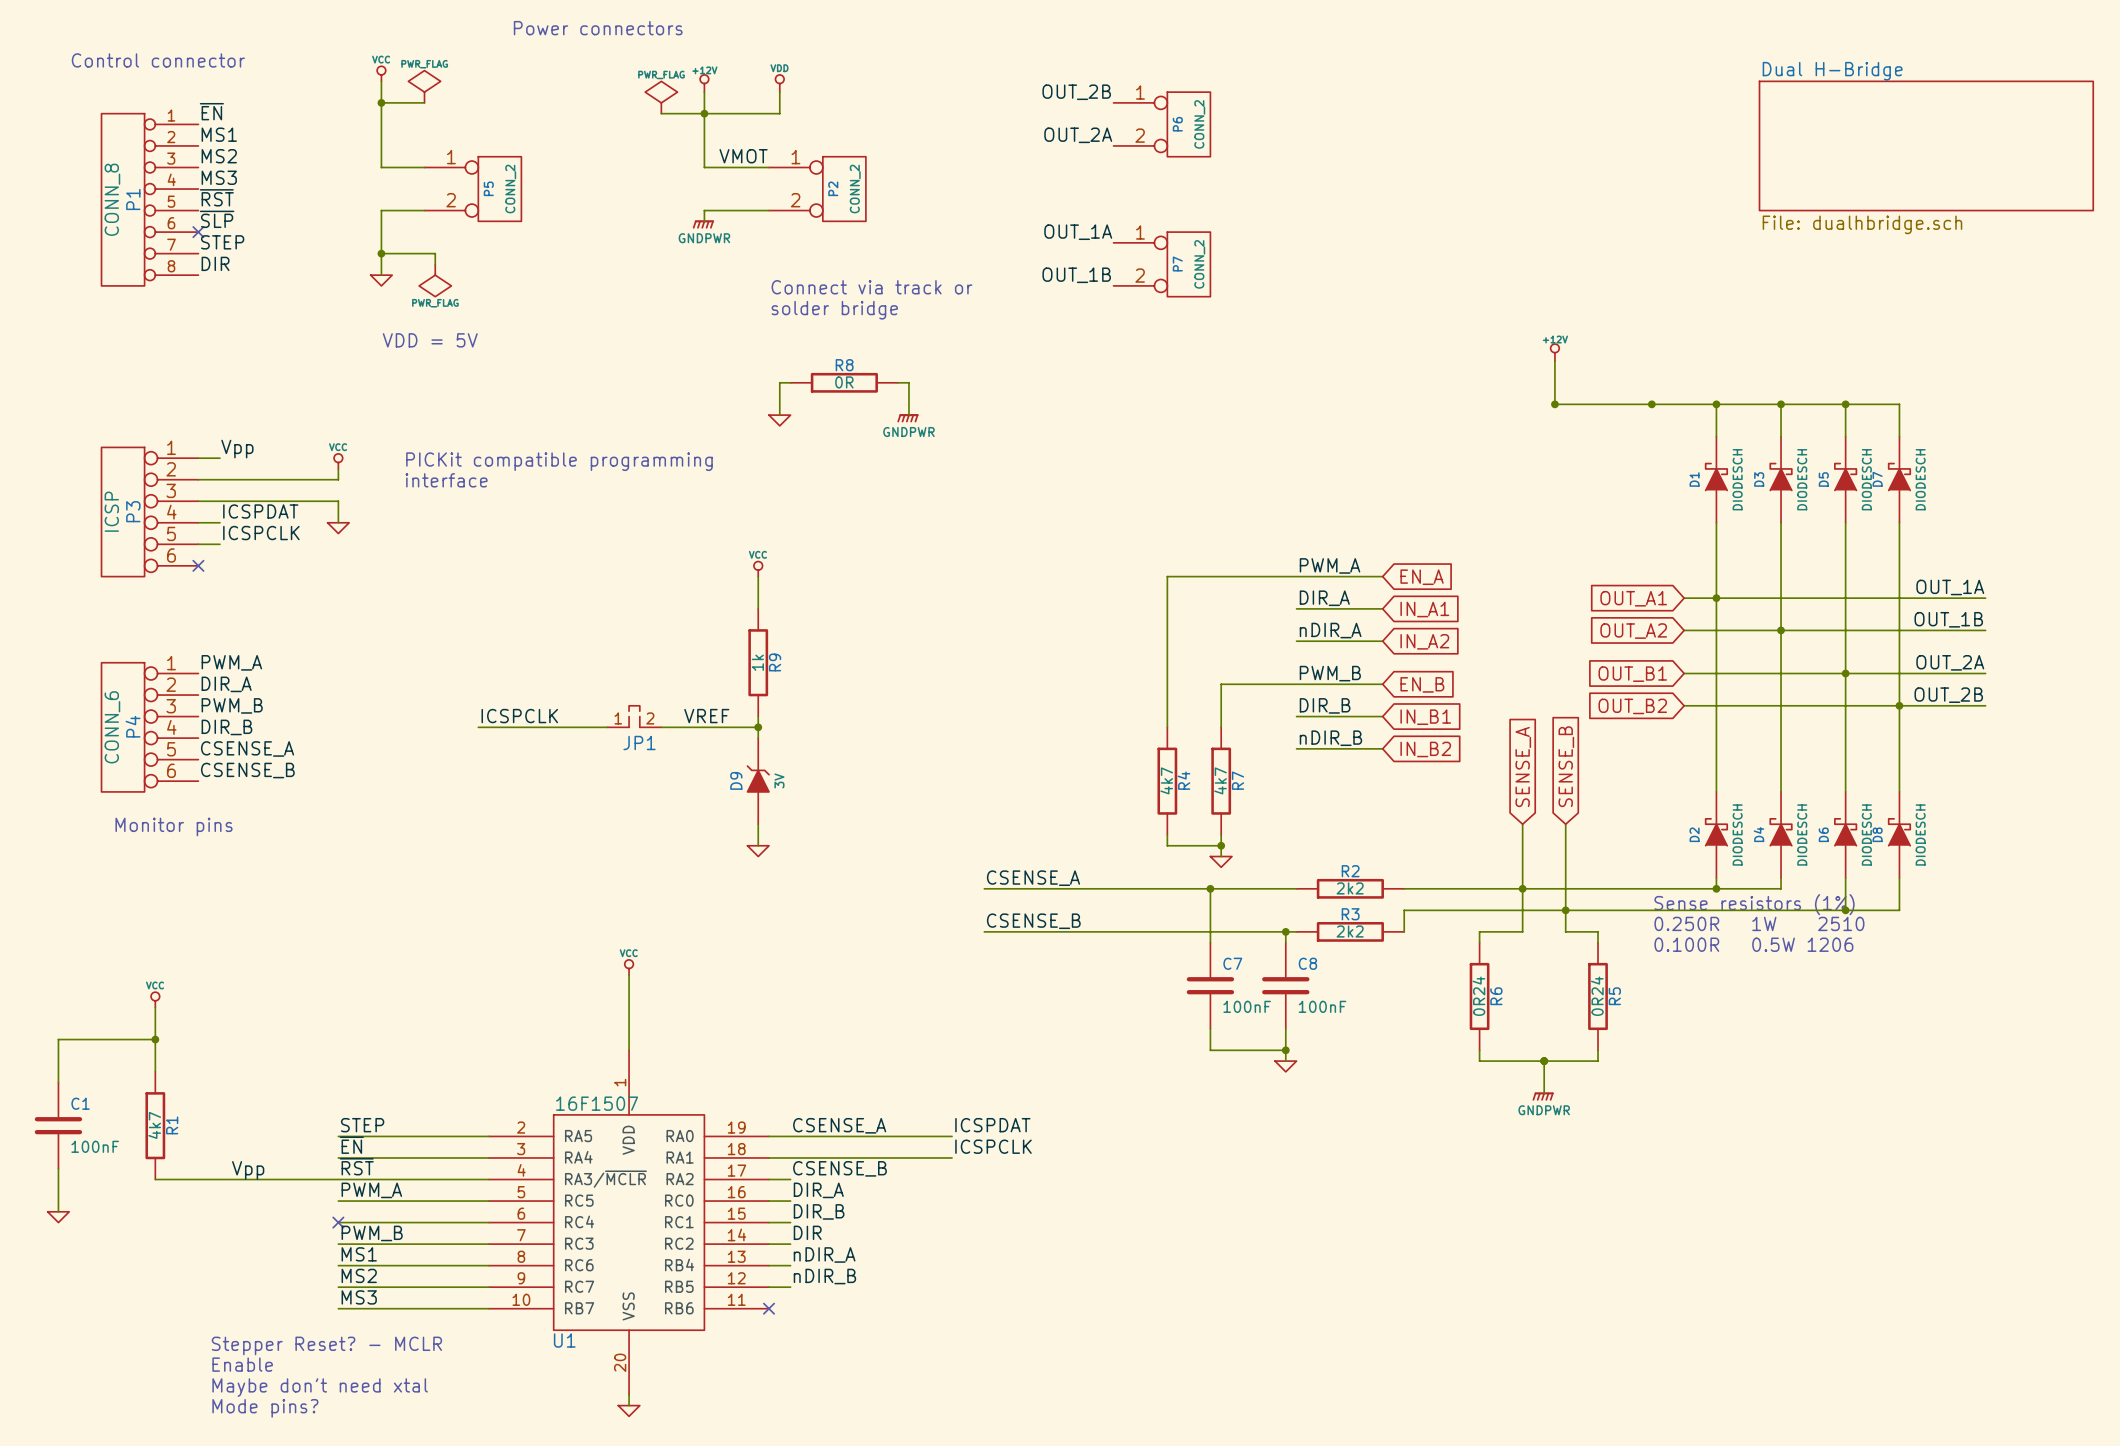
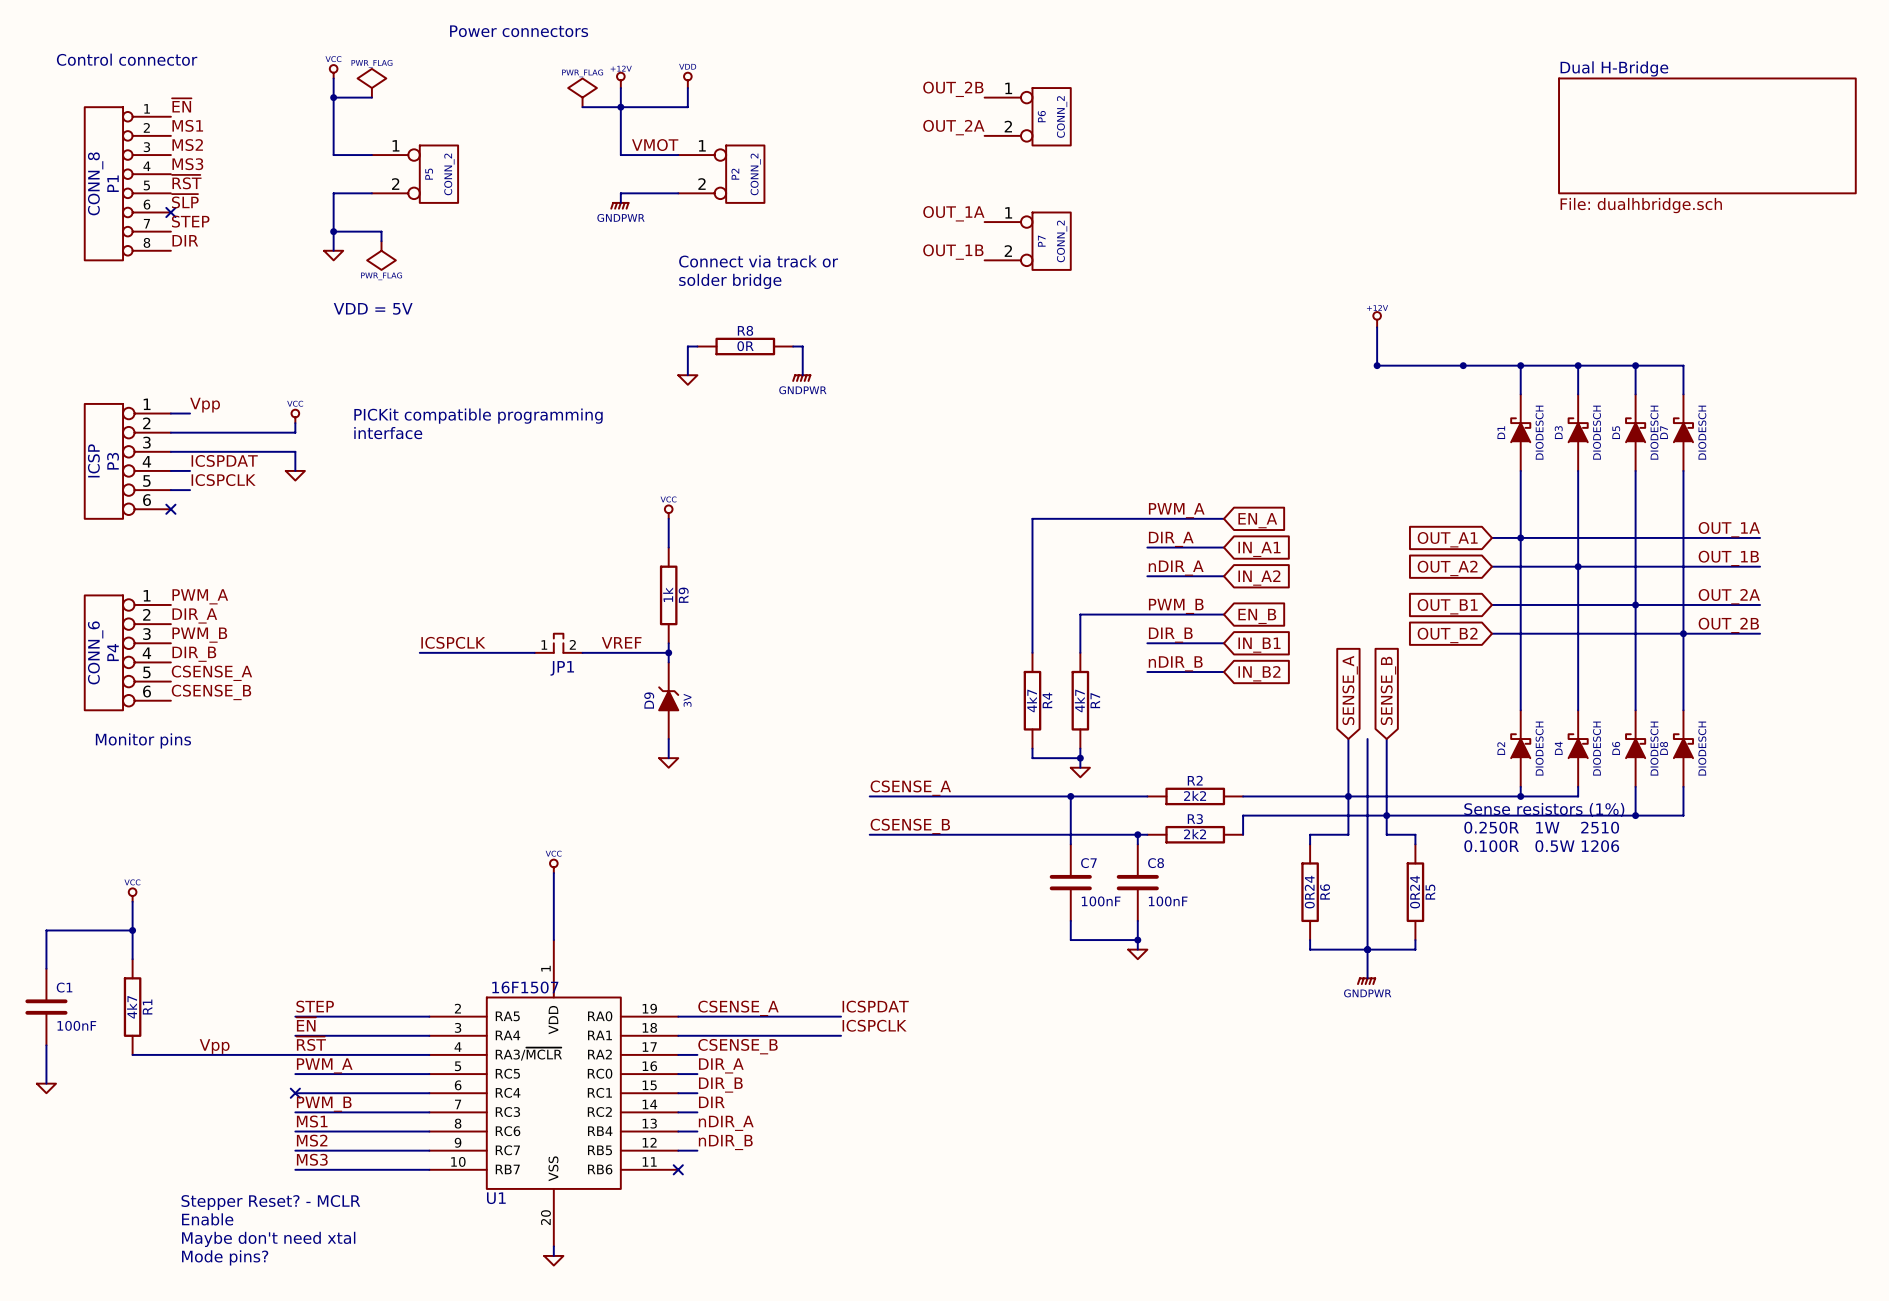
wire: none -> (1367, 739) (1367, 949)

